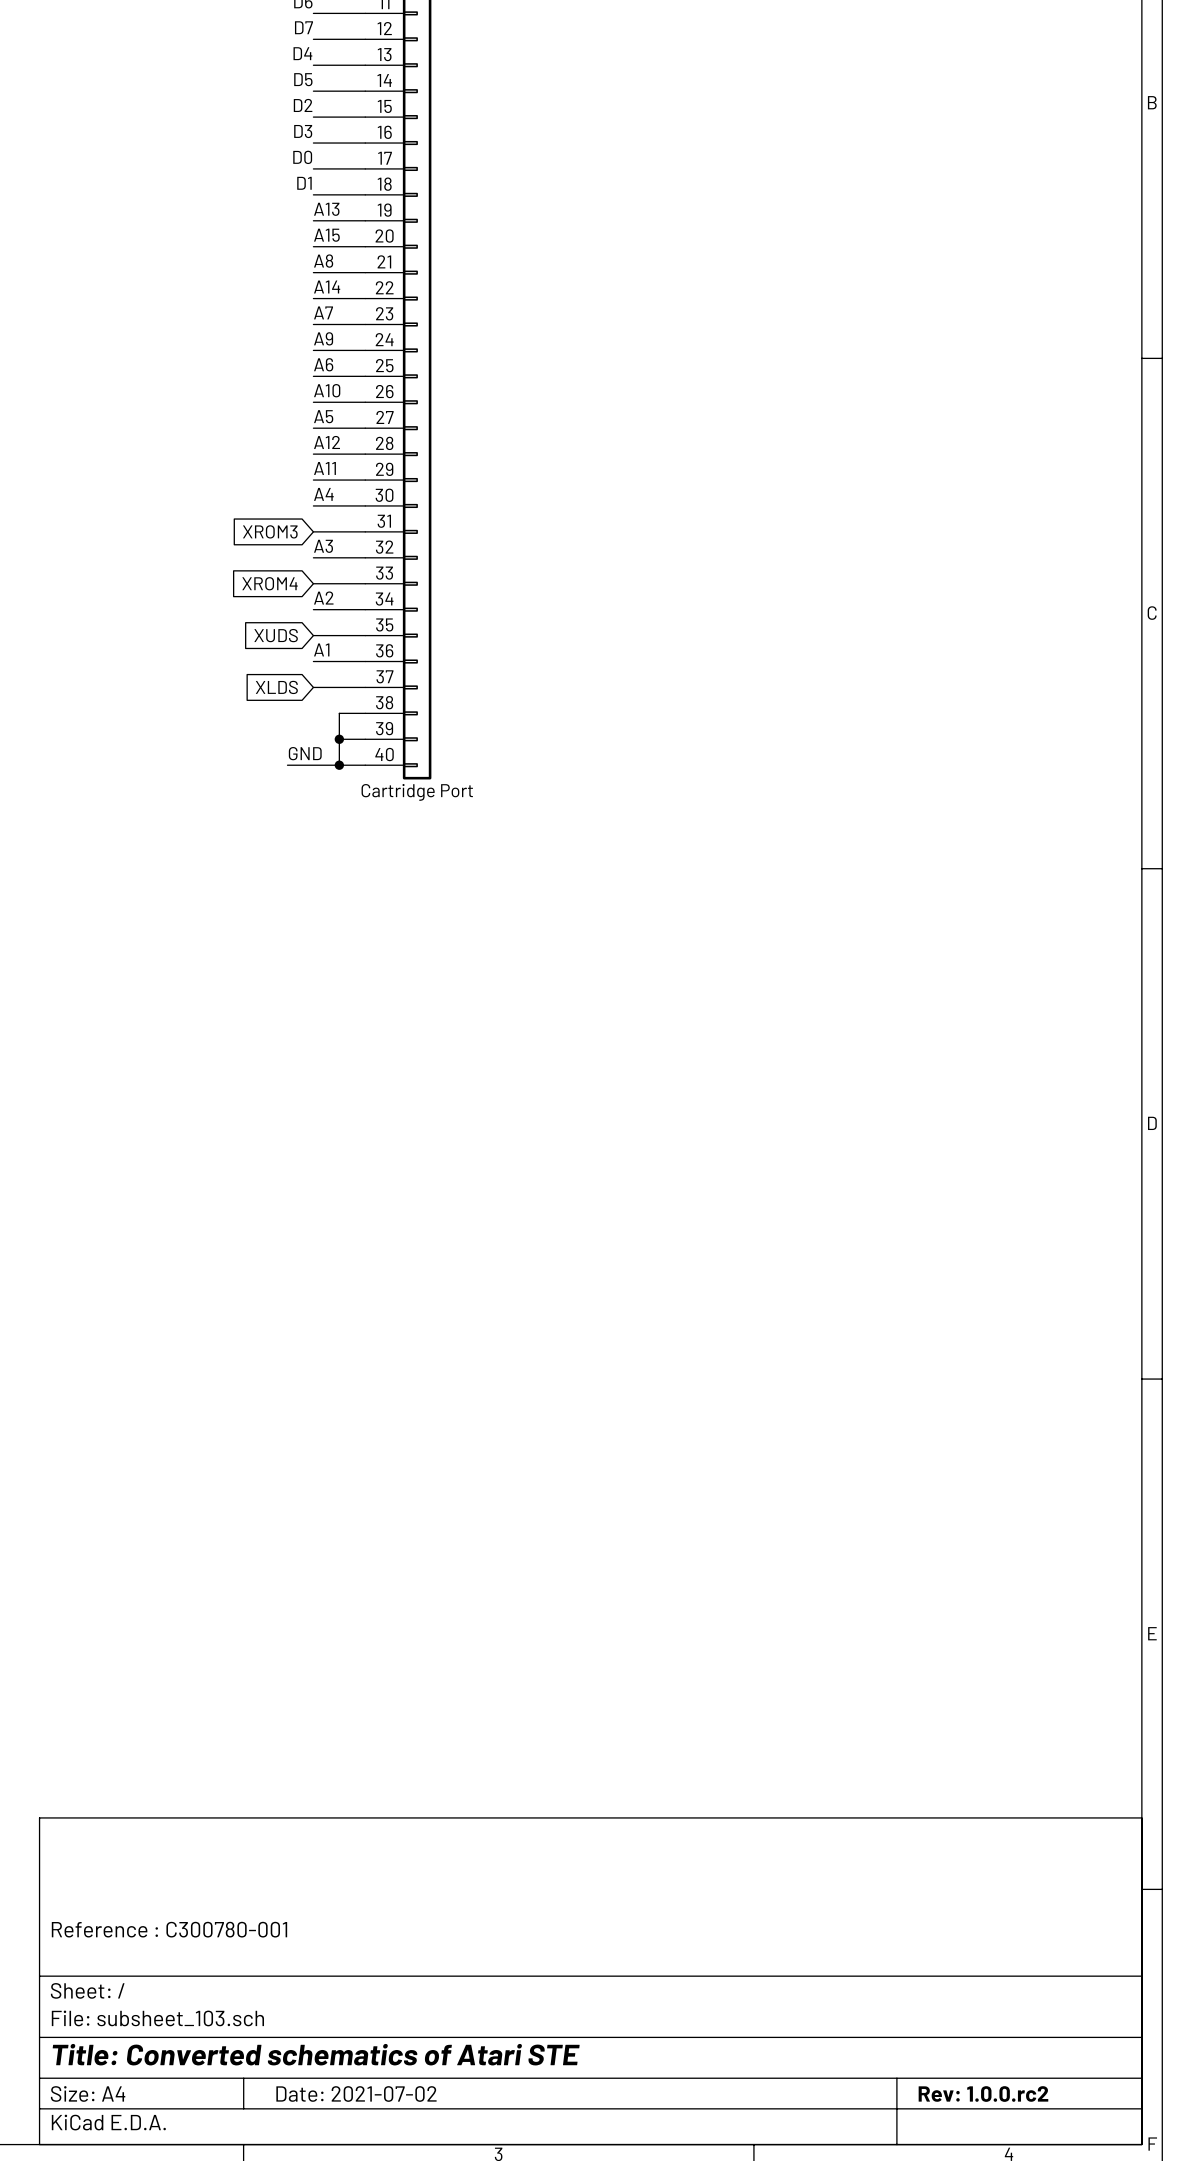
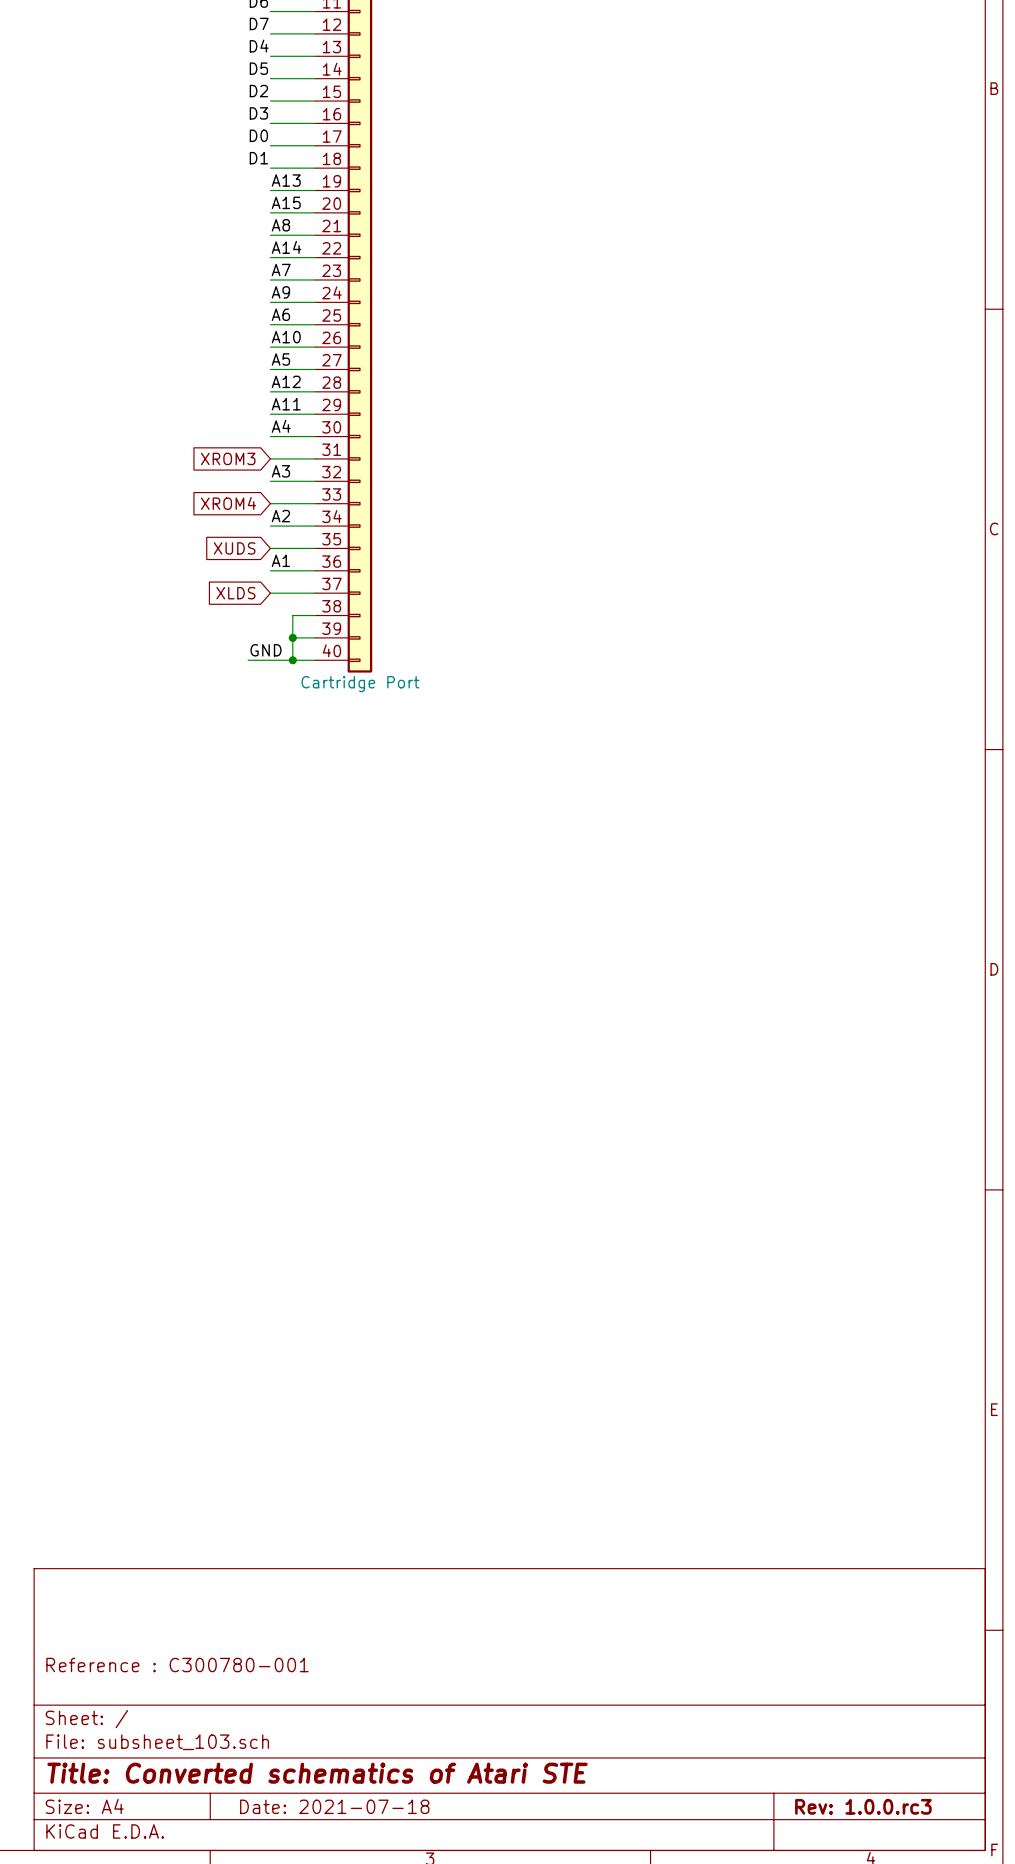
title block: Date: 2021-07-02 (356, 2093) -> Date: 2021-07-18 (334, 1806)
title block: Rev: 1.0.0.rc2 (983, 2094) -> Rev: 1.0.0.rc3 (863, 1806)

